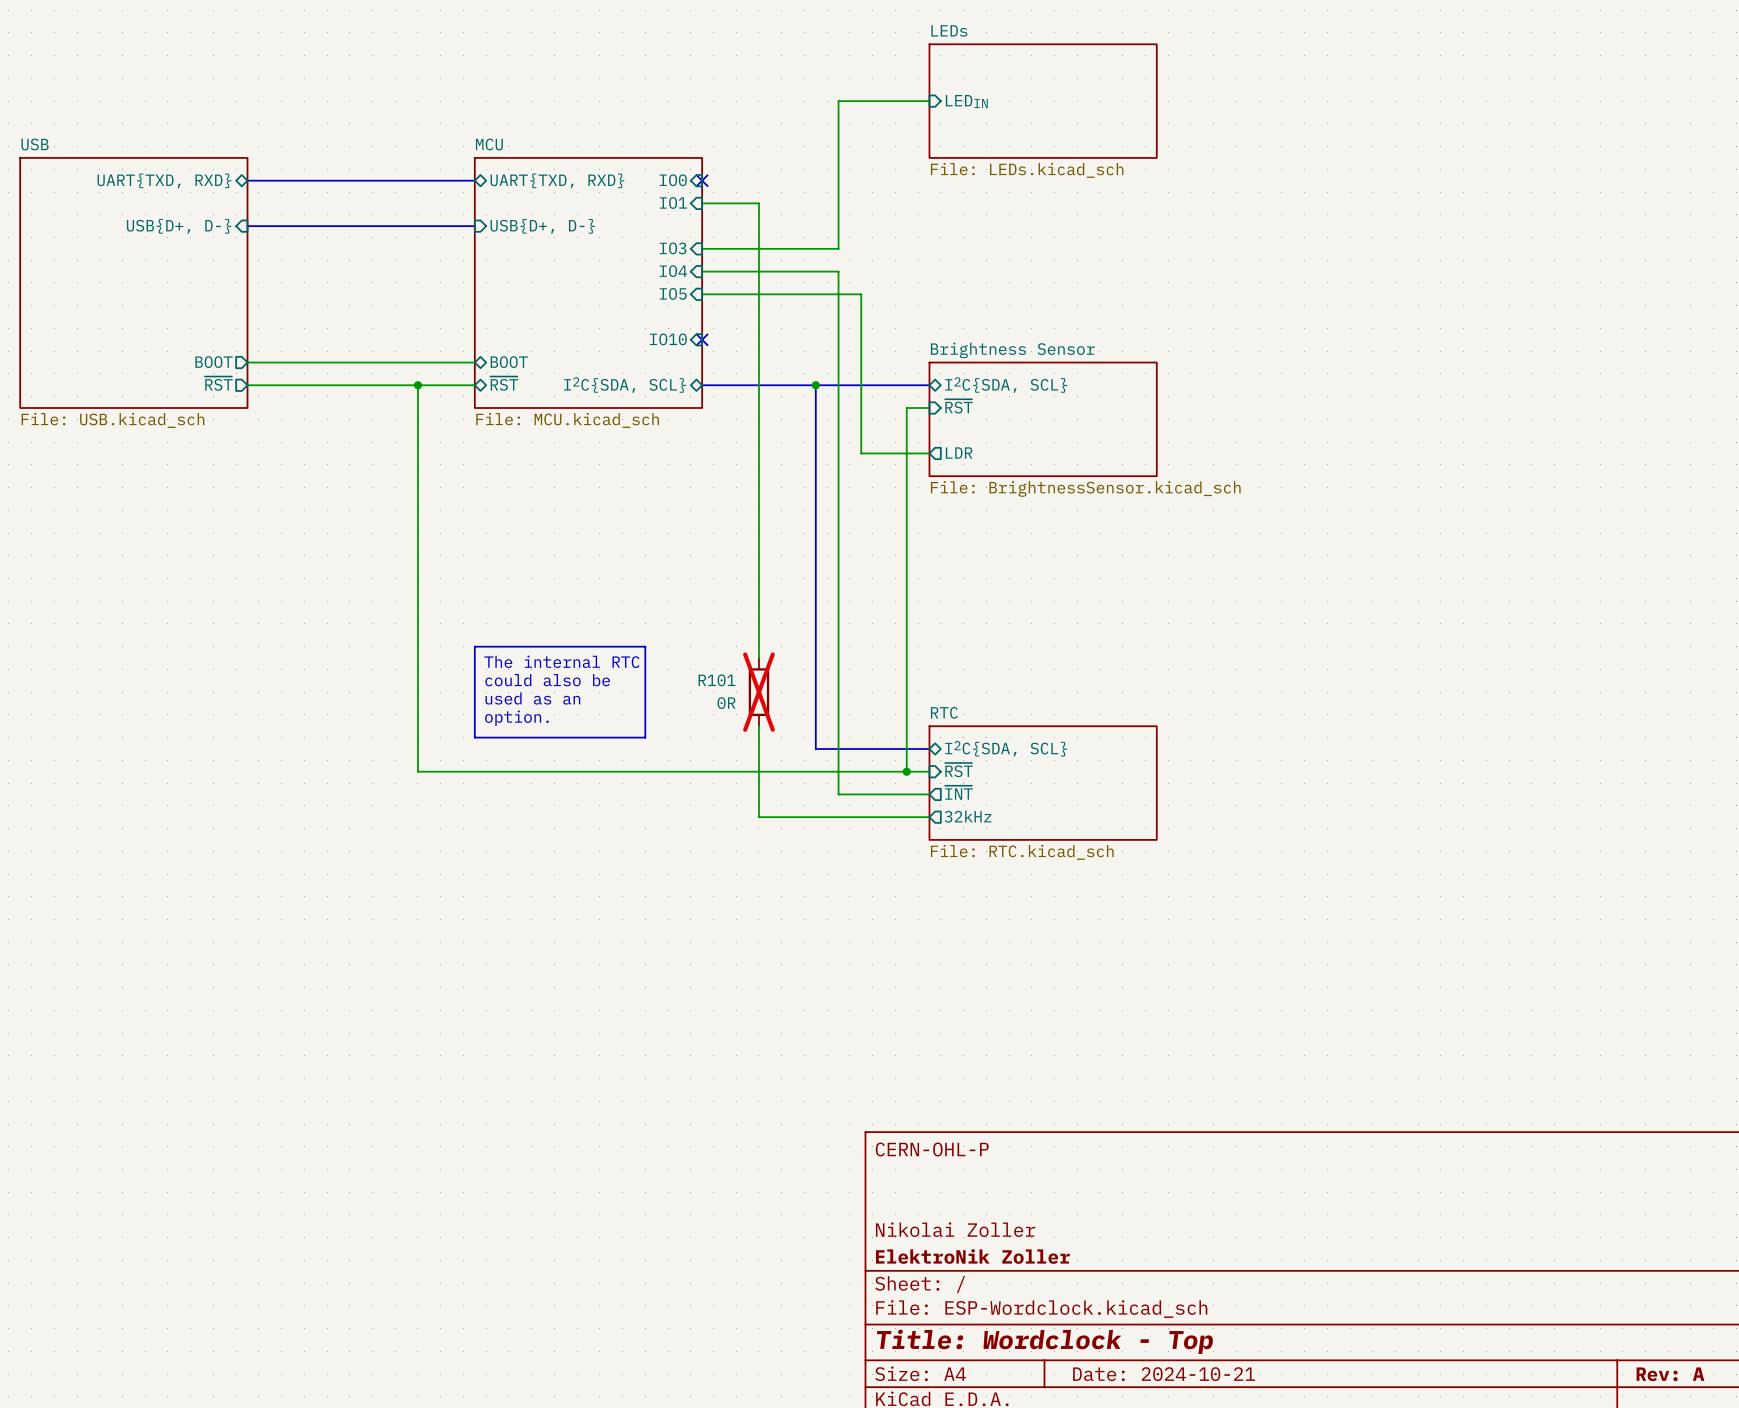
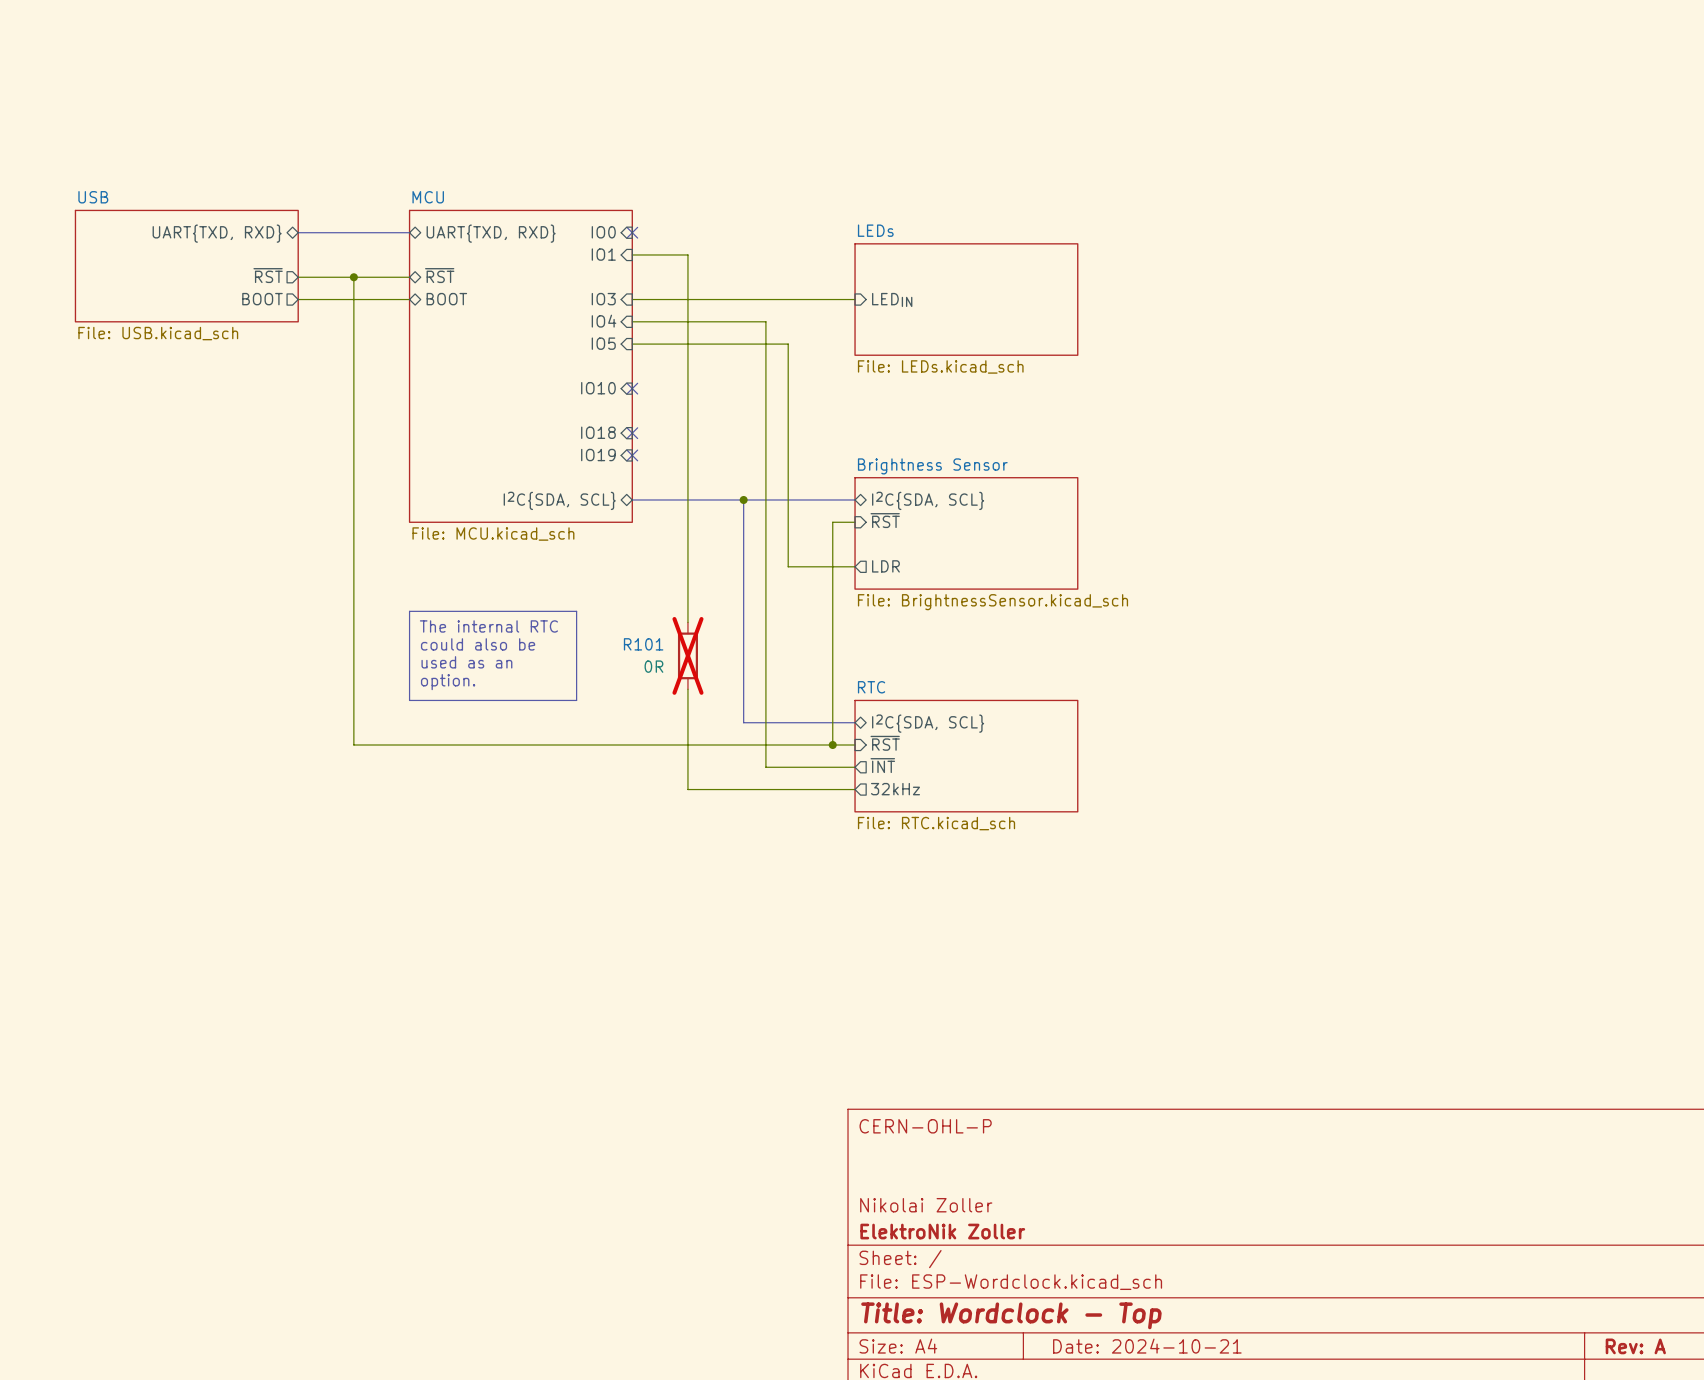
wire: (929, 101) (838, 101) (838, 248) (702, 248) -> none
sheet pin position: LEDIN (966, 101) -> LEDIN (892, 299)
sheet LEDs position: (1043, 101) -> (966, 299)
sheet pin position: UART{TXD, RXD} (164, 180) -> UART{TXD, RXD} (217, 233)
bus: (247, 180) (474, 180) -> none
sheet pin position: UART{TXD, RXD} (557, 180) -> UART{TXD, RXD} (491, 233)
sheet pin position: IO0 (673, 180) -> IO0 (603, 232)
no-connect mark: (702, 180) -> none
sheet pin position: IO1 (673, 202) -> IO1 (603, 254)
wire: (702, 203) (758, 203) (758, 658) -> none
sheet pin: USB{D+, D-} (179, 226) -> none
bus: (247, 226) (474, 226) -> none
sheet pin: USB{D+, D-} (542, 226) -> none
bus: none -> (298, 232) (409, 232)
no-connect mark: none -> (632, 232)
sheet pin position: IO3 (673, 248) -> IO3 (603, 299)
wire: none -> (632, 254) (687, 254) (687, 622)
sheet USB: none -> File: USB.kicad_sch (186, 266)
sheet pin position: IO4 (673, 271) -> IO4 (604, 321)
wire: (702, 271) (838, 271) (838, 794) (929, 794) -> none
sheet pin: none -> ~{RST} (268, 275)
sheet pin: none -> ~{RST} (439, 275)
sheet USB: File: USB.kicad_sch (133, 282) -> none
wire: none -> (298, 277) (409, 277)
wire: none -> (353, 277) (353, 744) (855, 744)
junction: none -> (353, 277)
sheet MCU: File: MCU.kicad_sch (588, 282) -> none
sheet pin position: IO5 (673, 293) -> IO5 (603, 343)
wire: (702, 294) (861, 294) (861, 453) (929, 453) -> none
wire: none -> (298, 299) (409, 299)
wire: none -> (632, 299) (855, 299)
wire: none -> (632, 321) (765, 321) (765, 767) (855, 767)
sheet pin position: IO10 (668, 339) -> IO10 (598, 388)
no-connect mark: (702, 339) -> none
wire: none -> (632, 344) (788, 344) (788, 566) (855, 566)
sheet pin position: BOOT (214, 362) -> BOOT (262, 299)
wire: (247, 362) (474, 362) -> none
sheet pin position: BOOT (509, 362) -> BOOT (446, 299)
sheet MCU: none -> File: MCU.kicad_sch (520, 366)
sheet pin: ~{RST} (218, 383) -> none
sheet pin: ~{RST} (504, 383) -> none
wire: (247, 385) (474, 385) -> none
wire: (417, 385) (417, 771) (929, 771) -> none
junction: (417, 385) -> none
sheet pin: I2C{SDA, SCL} (625, 385) -> none
bus: (702, 385) (929, 385) -> (632, 499) (855, 499)
bus: (815, 385) (815, 748) (929, 748) -> none
junction: (815, 385) -> none
sheet pin: I2C{SDA, SCL} (1006, 385) -> none
no-connect mark: none -> (632, 388)
sheet pin: ~{RST} (958, 406) -> none
wire: (929, 408) (906, 408) (906, 771) -> none
sheet Brightness Sensor position: (1043, 419) -> (966, 533)
sheet pin: none -> IO18 (598, 432)
no-connect mark: none -> (632, 433)
sheet pin position: LDR (959, 453) -> LDR (885, 566)
sheet pin: none -> IO19 (598, 455)
no-connect mark: none -> (632, 455)
sheet pin: none -> I2C{SDA, SCL} (559, 500)
bus: none -> (743, 499) (743, 722) (855, 722)
junction: none -> (743, 499)
sheet pin: none -> I2C{SDA, SCL} (928, 500)
sheet pin: none -> ~{RST} (885, 520)
wire: none -> (855, 522) (832, 522) (832, 744)
line: (474, 646) (645, 646) (645, 737) (474, 737) (474, 646) -> (409, 611) (576, 611) (576, 700) (409, 700) (409, 611)
text position: The internal RTC (561, 661) -> The internal RTC (488, 626)
text position: could also be (547, 680) -> could also be (478, 644)
R101 position: (758, 692) -> (687, 655)
text position: used as an (532, 698) -> used as an (466, 662)
wire: none -> (687, 689) (687, 789) (855, 789)
text position: option. (516, 718) -> option. (448, 682)
wire: (758, 726) (758, 817) (929, 817) -> none
sheet pin position: I2C{SDA, SCL} (1006, 748) -> I2C{SDA, SCL} (928, 723)
junction: none -> (832, 744)
sheet pin position: ~{RST} (958, 770) -> ~{RST} (885, 743)
junction: (906, 771) -> none
sheet RTC position: (1043, 783) -> (966, 756)
sheet pin position: ~{INT} (958, 792) -> ~{INT} (882, 765)
sheet pin position: 32kHz (968, 816) -> 32kHz (895, 789)

